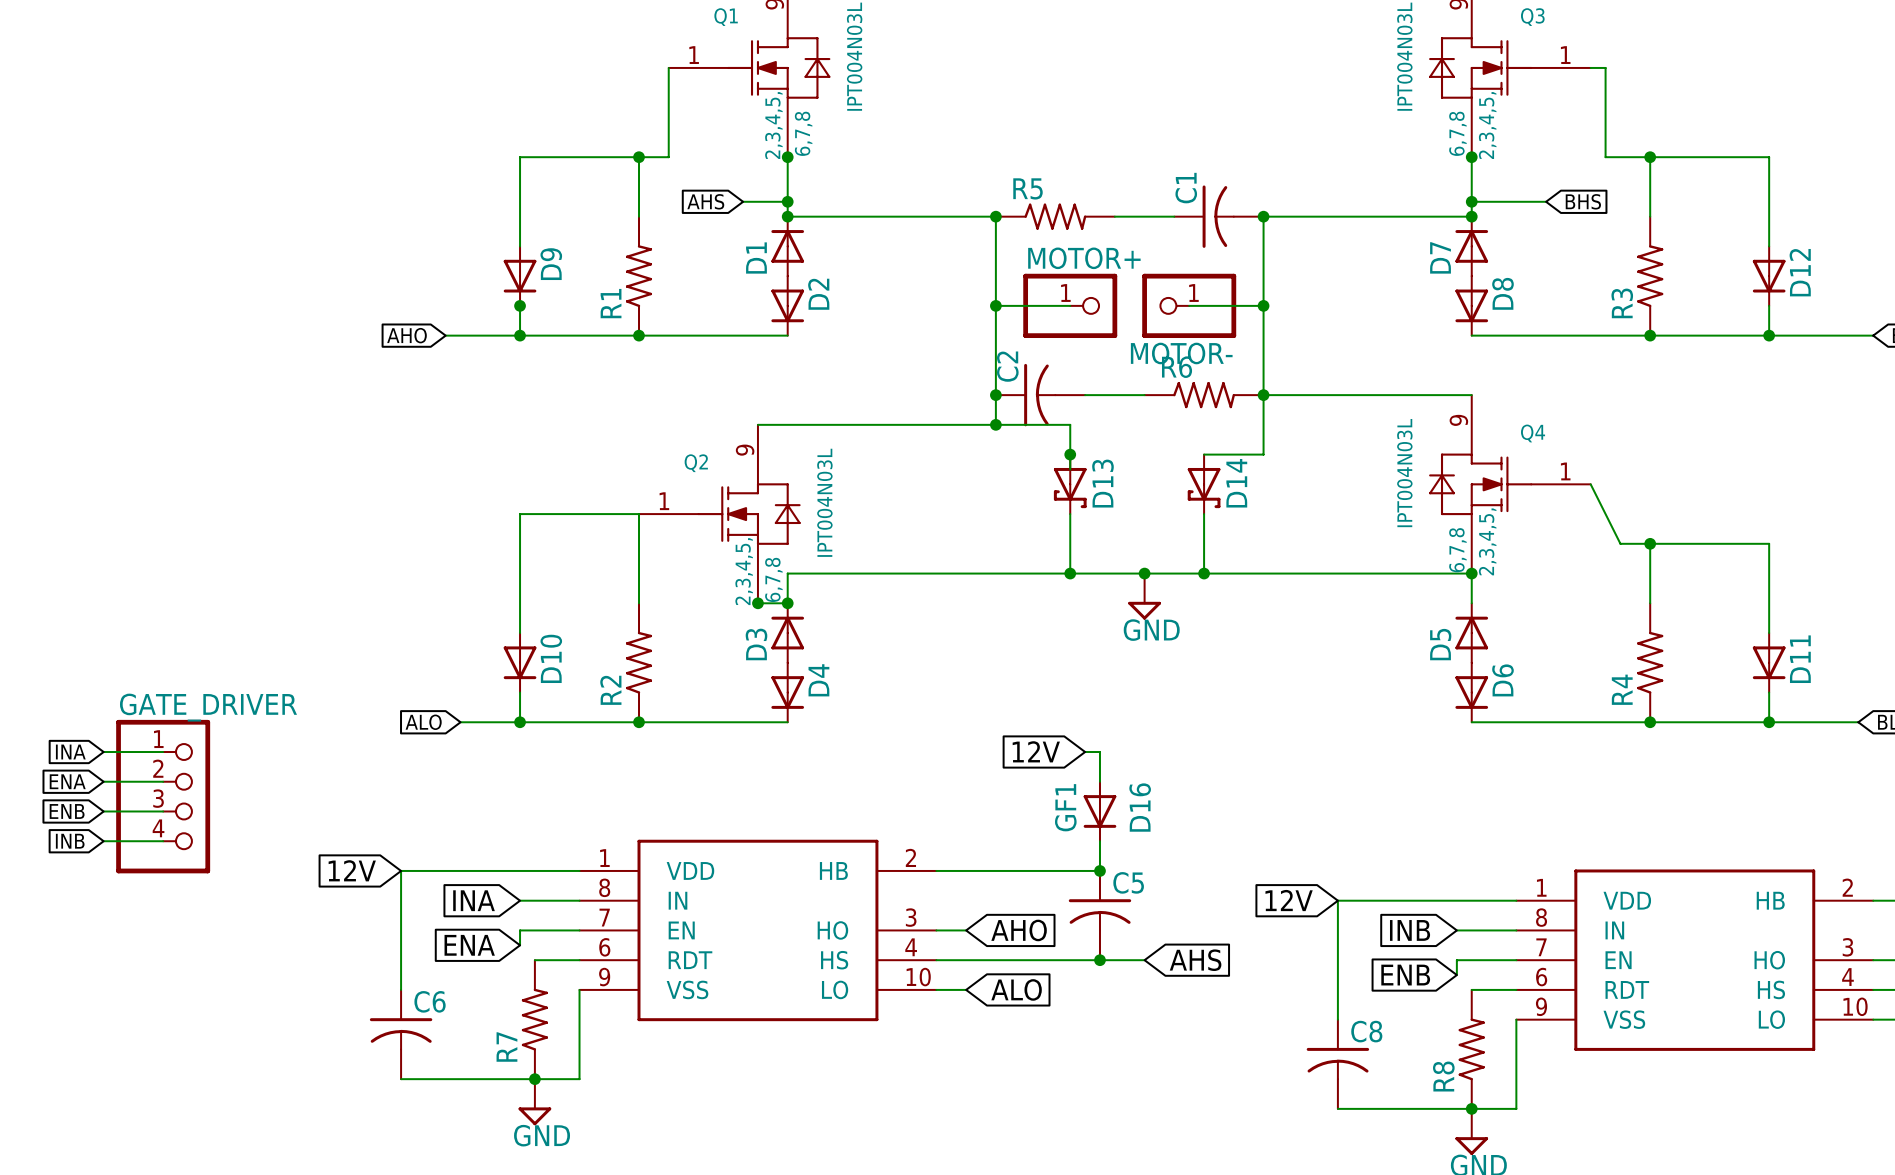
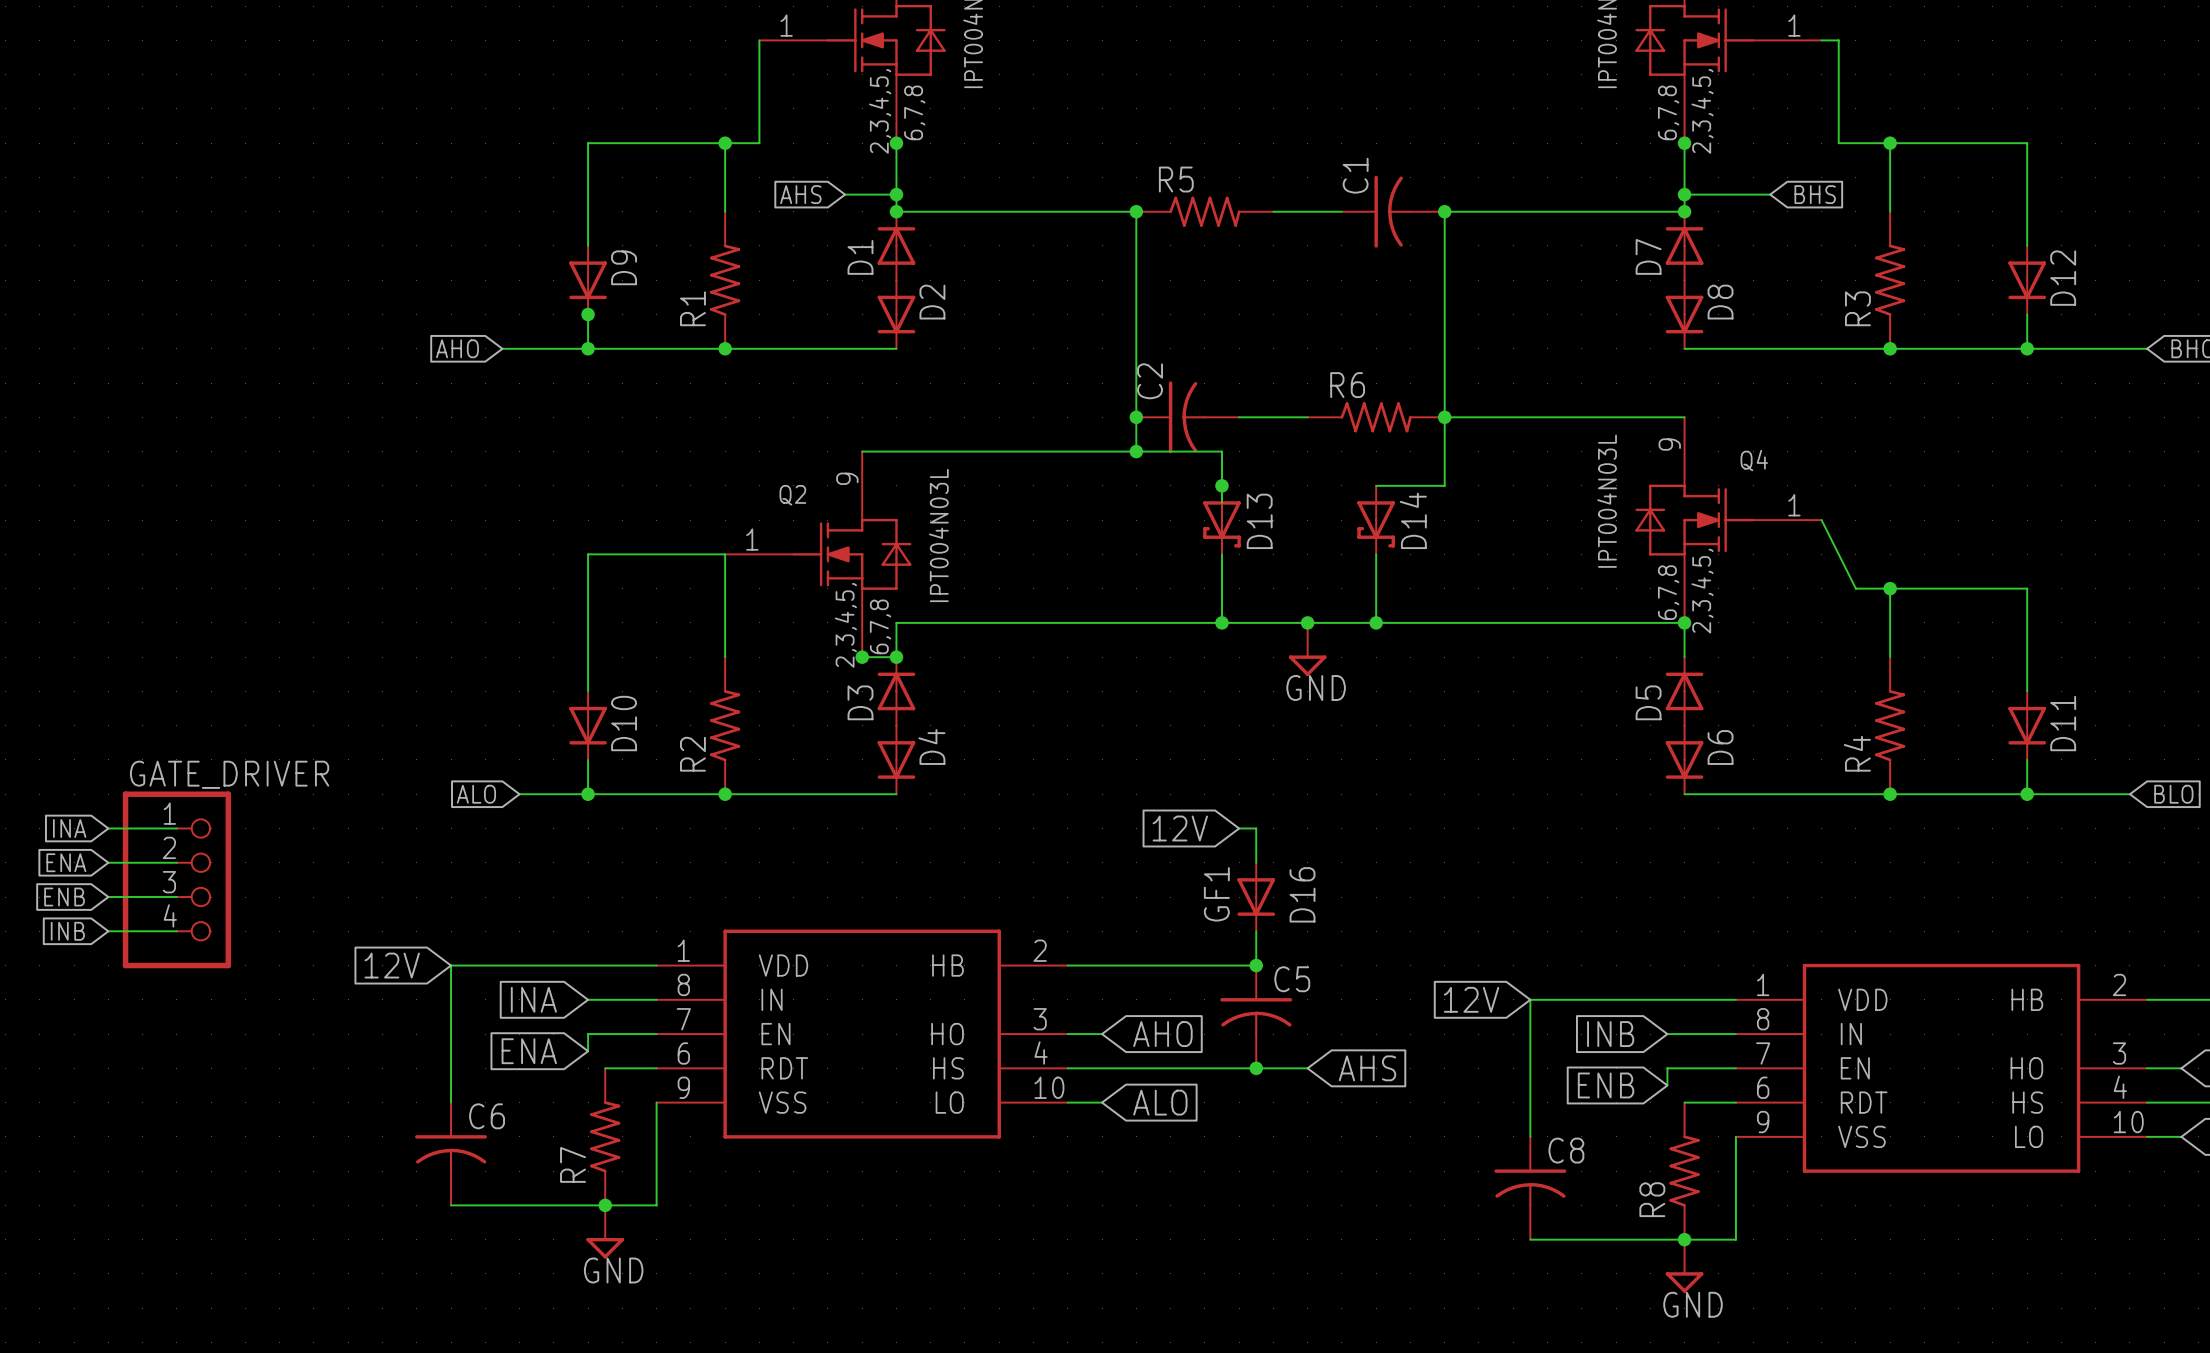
wire: (995, 305) (1070, 305) -> none
junction: (995, 305) -> none
MOTOR+: (1070, 305) -> none
wire: (1189, 305) (1263, 305) -> none
MOTOR-: (1189, 305) -> none
junction: (1263, 305) -> none

